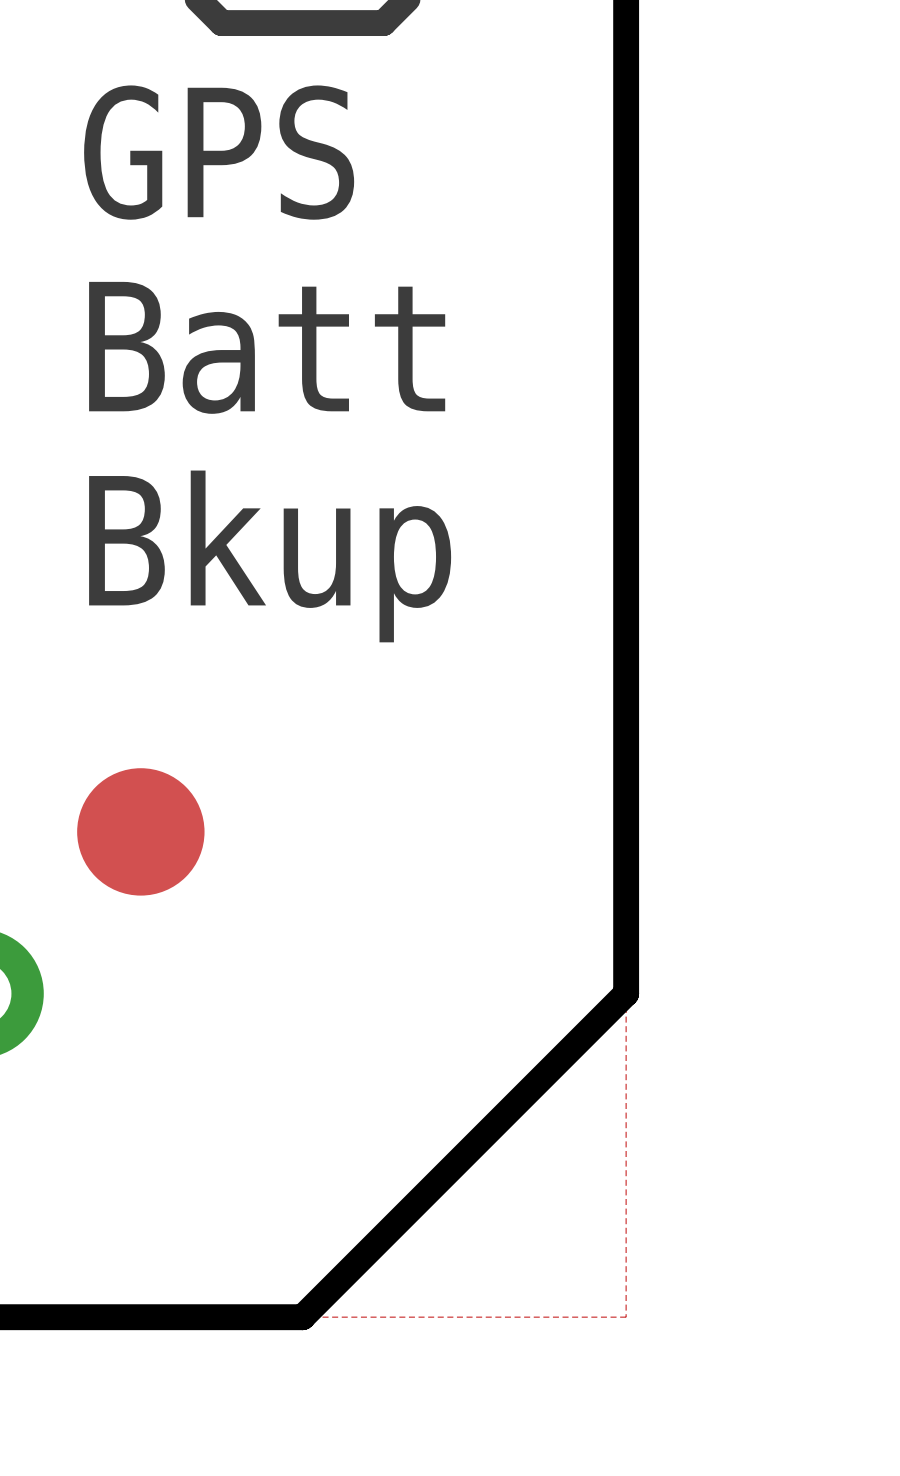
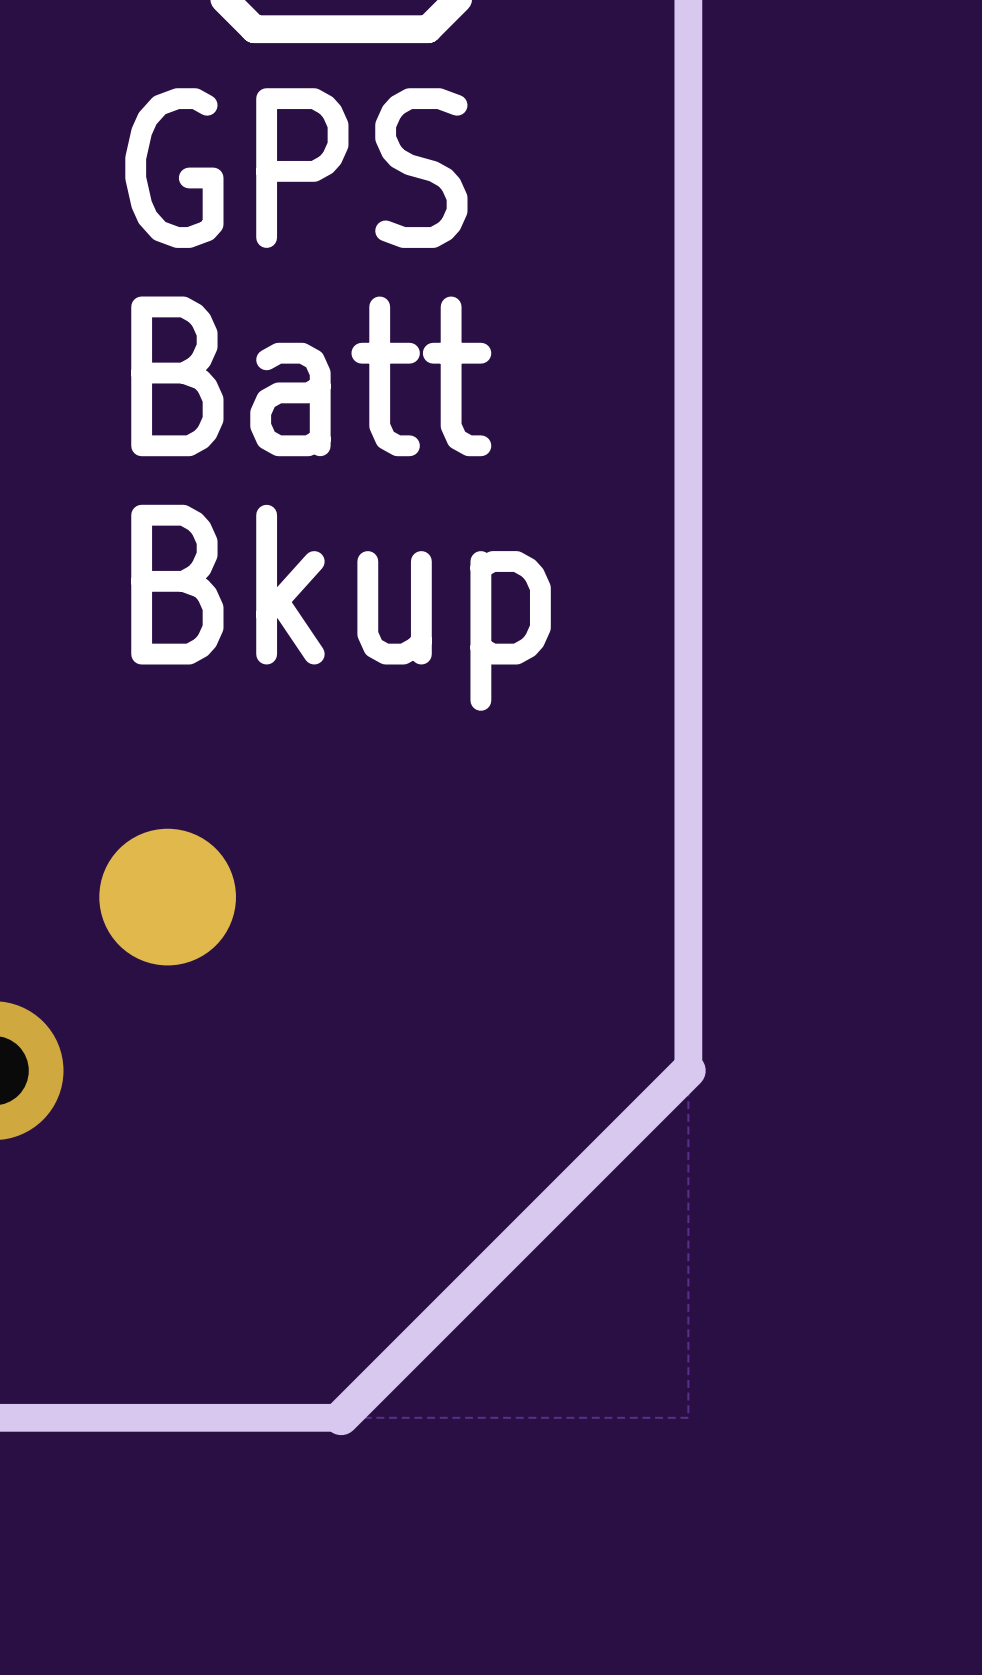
board edge width: thin (626, 993) (302, 1317) -> thick (688, 1070) (341, 1417)

